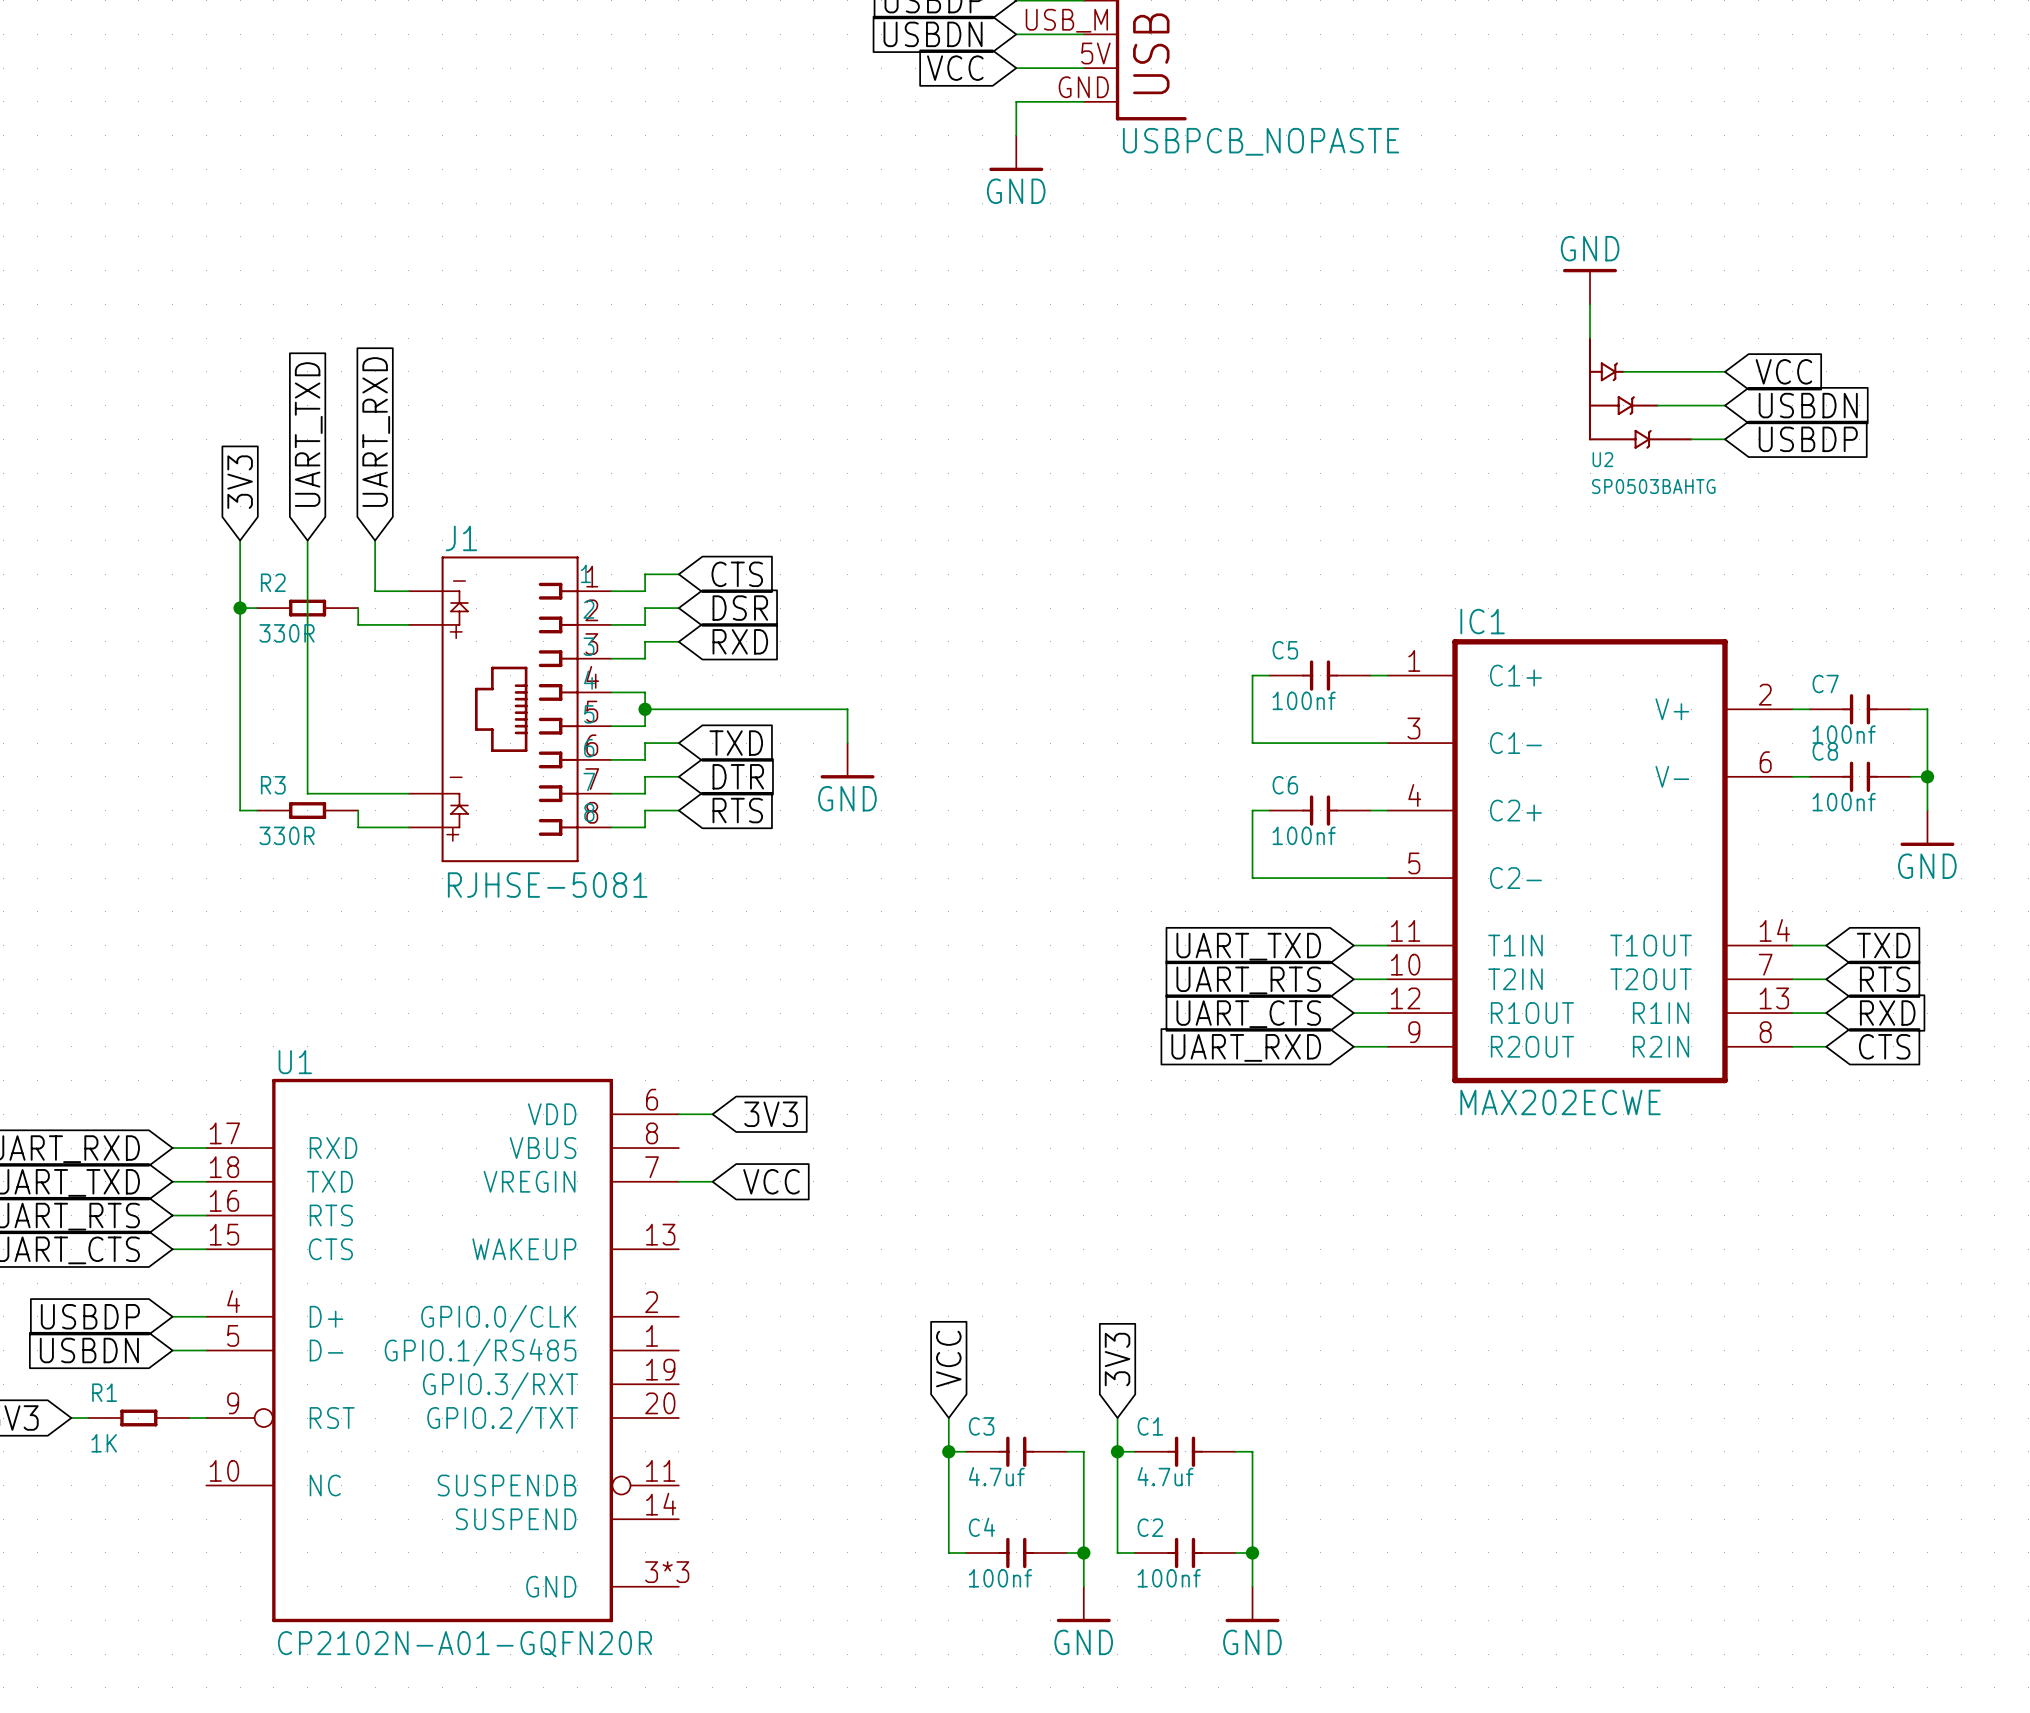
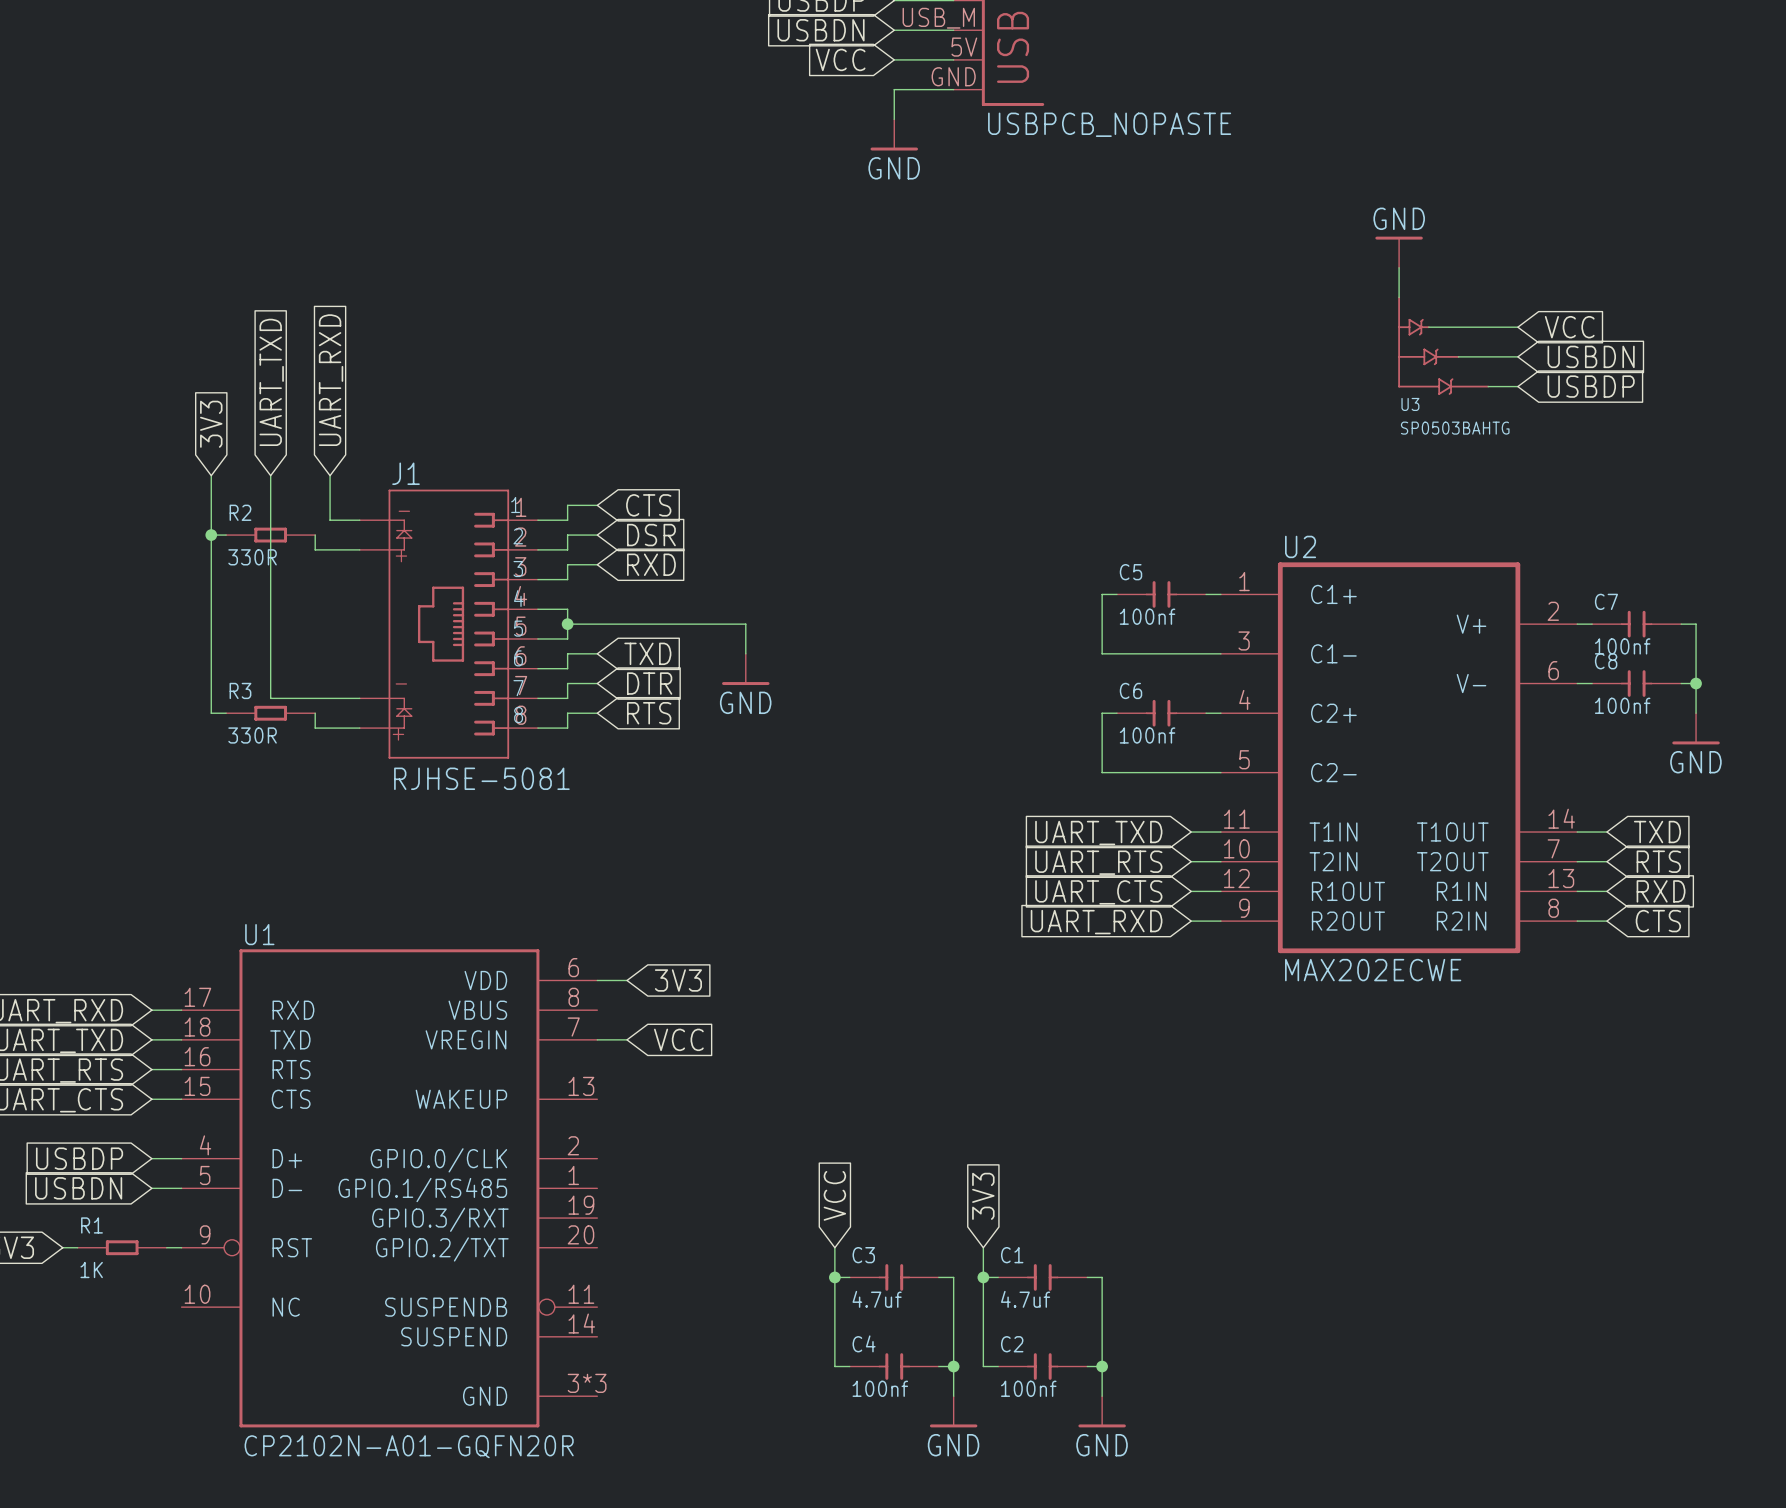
U2 name: U2 (1602, 459) -> U3 (1410, 404)
IC1 name: IC1 (1482, 621) -> U2 (1300, 546)

